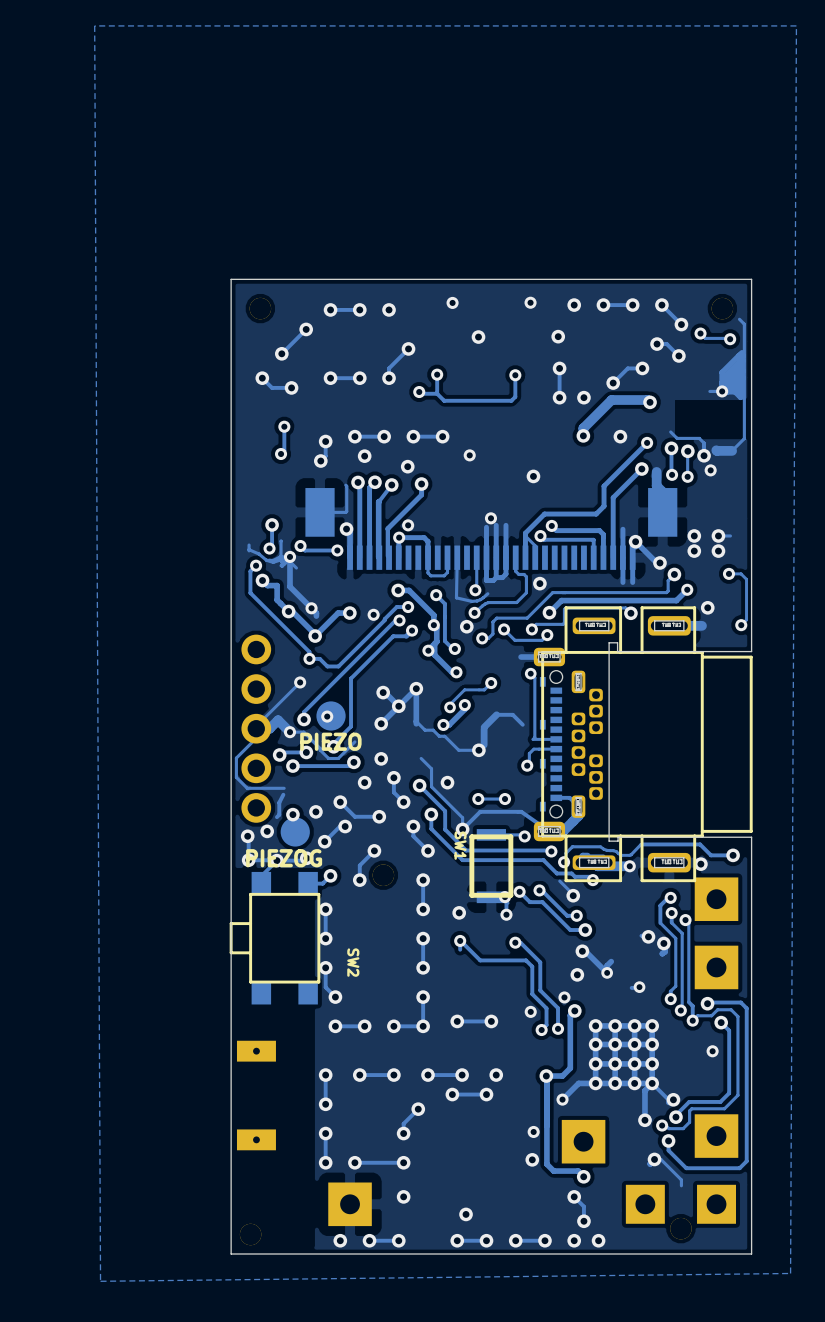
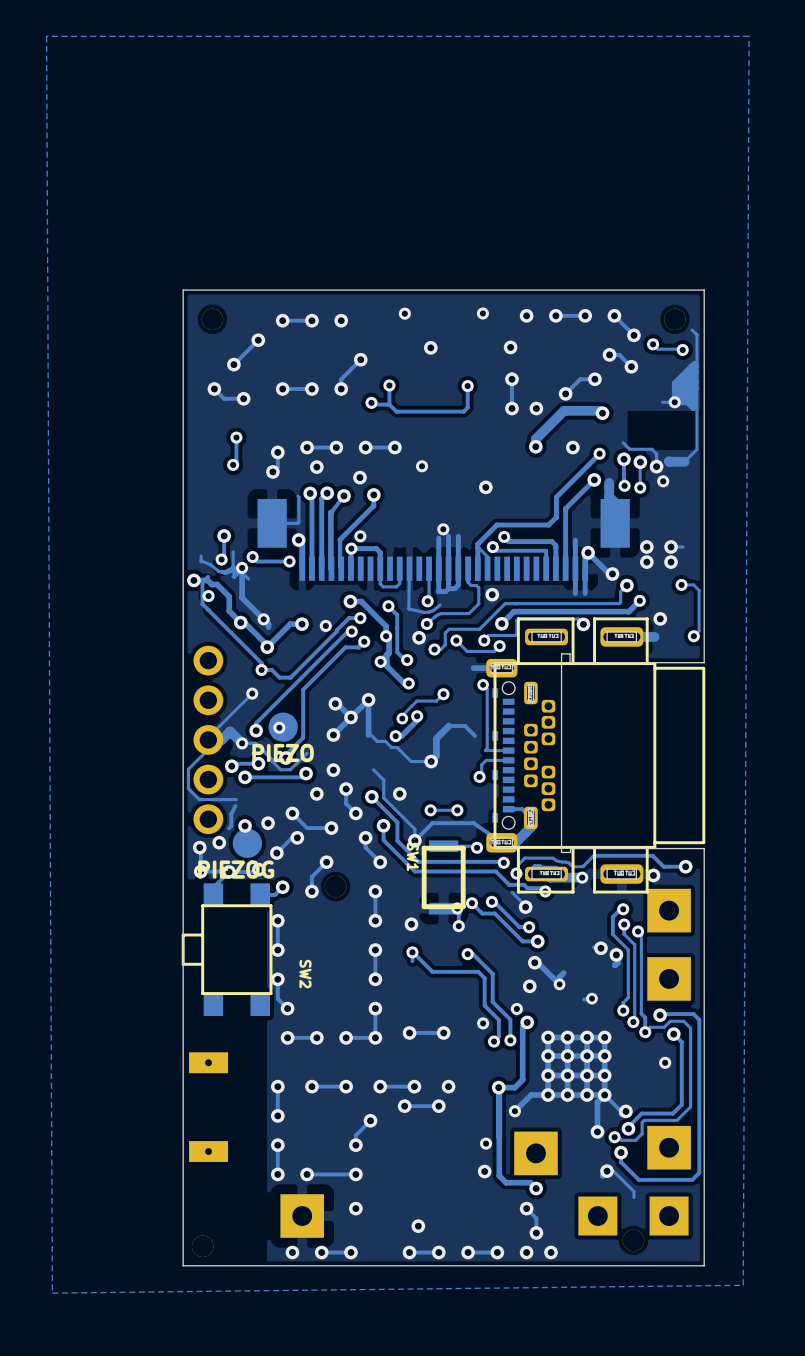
via position: (256, 565) -> (208, 596)
track: (262, 580) (267, 585) (277, 585) -> (193, 580) (207, 580) (211, 584) (217, 584) (229, 596)
via position: (262, 580) -> (193, 580)

